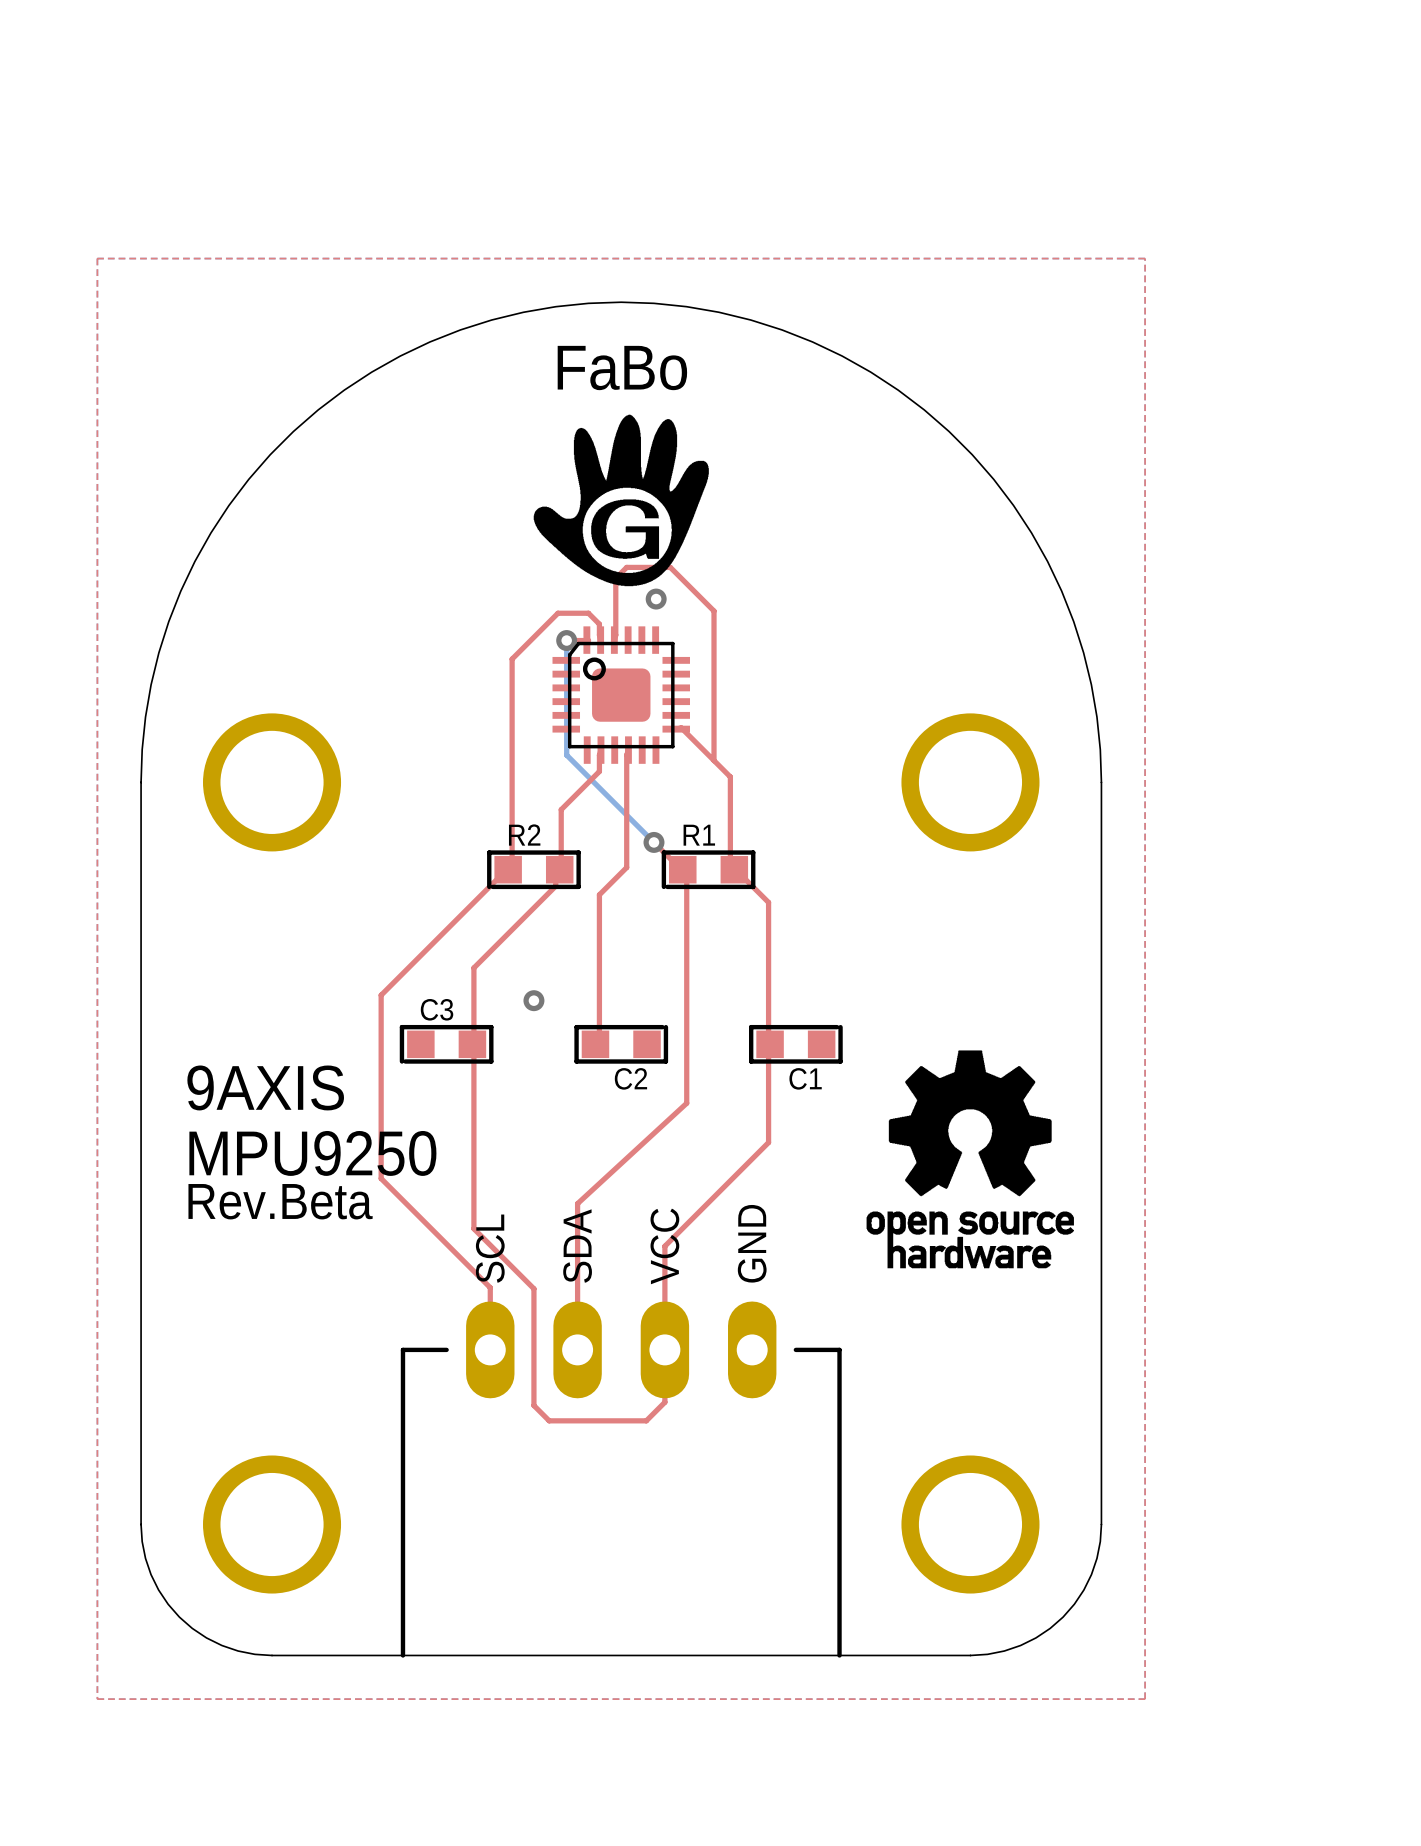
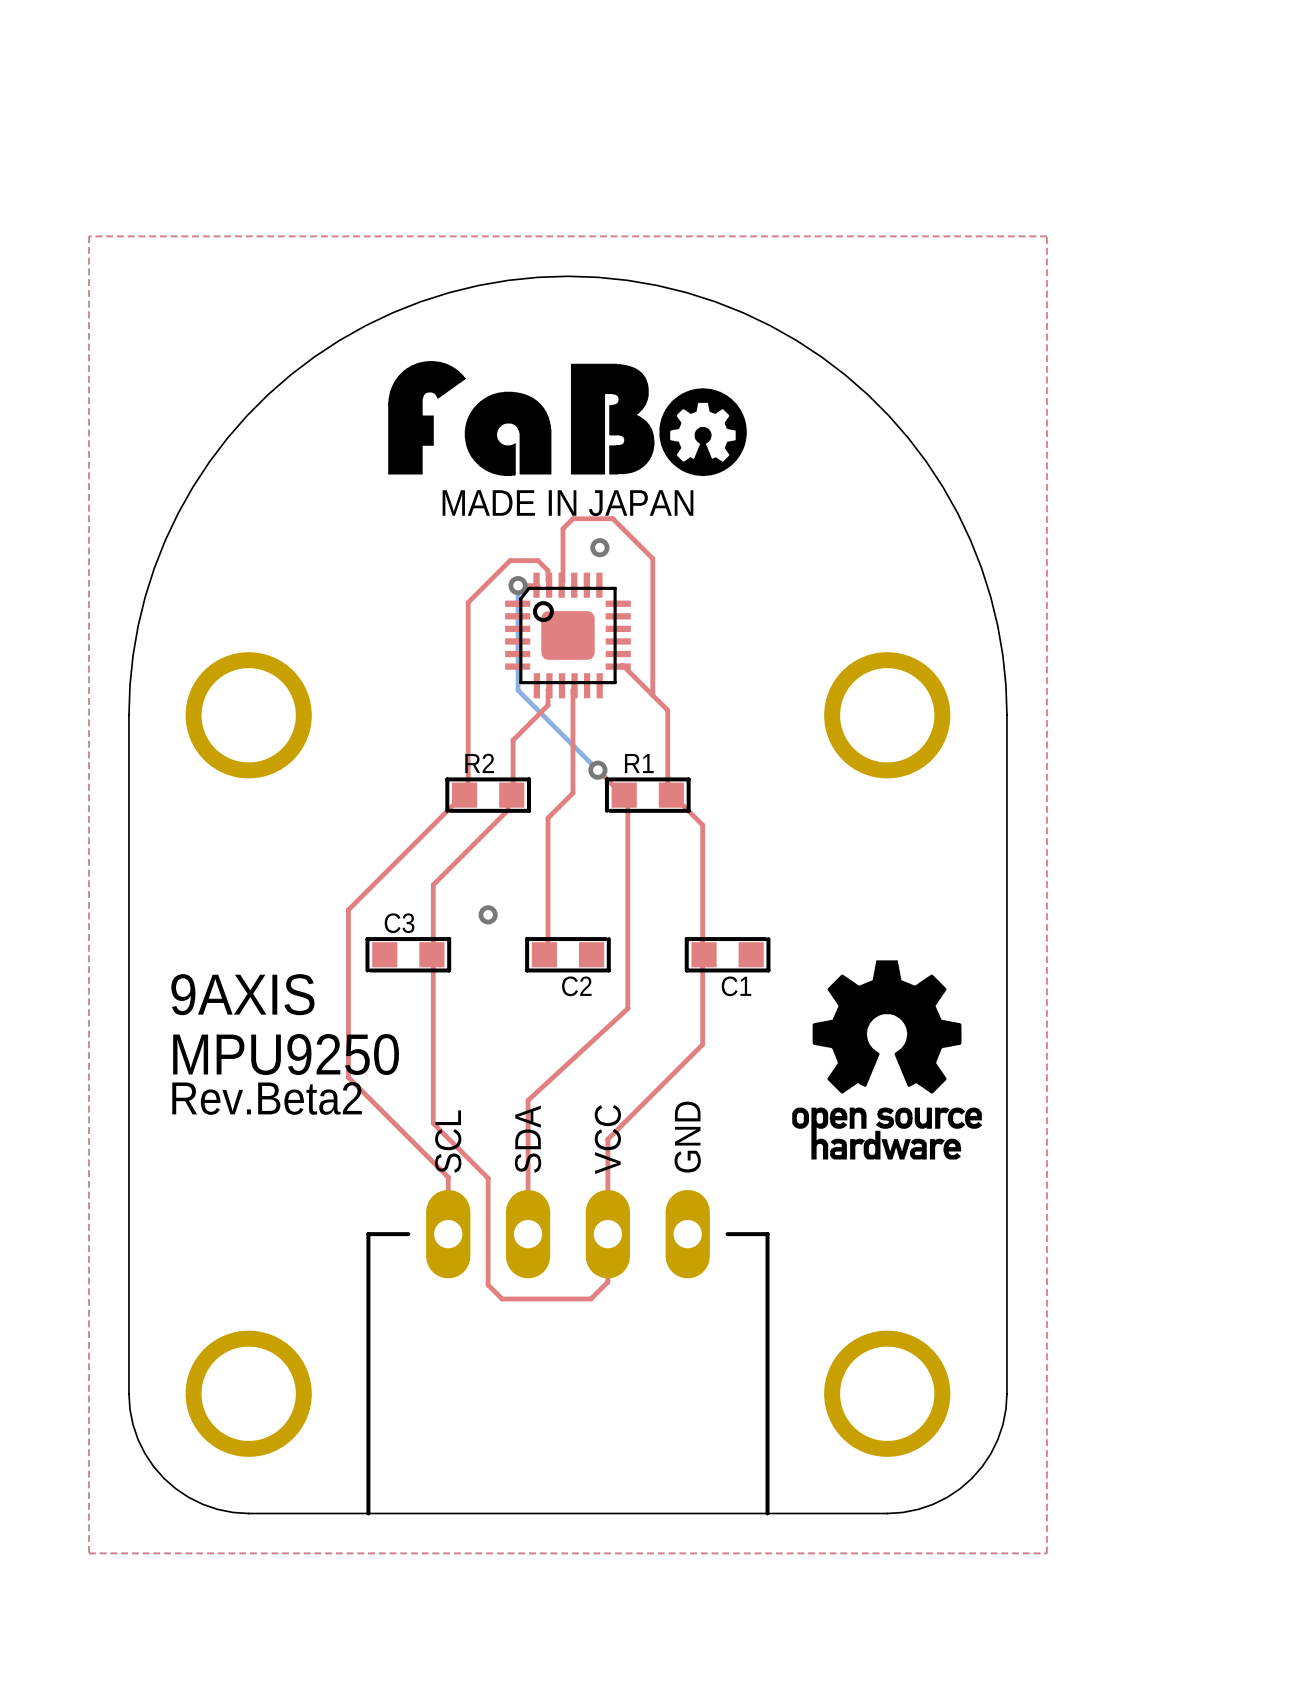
drawing: none -> [388, 361, 747, 477]
drawing: [533, 414, 709, 587] -> none
text: none -> MADE IN JAPAN (567, 503)
text: Rev.Beta (280, 1201) -> Rev.Beta2 (267, 1098)

